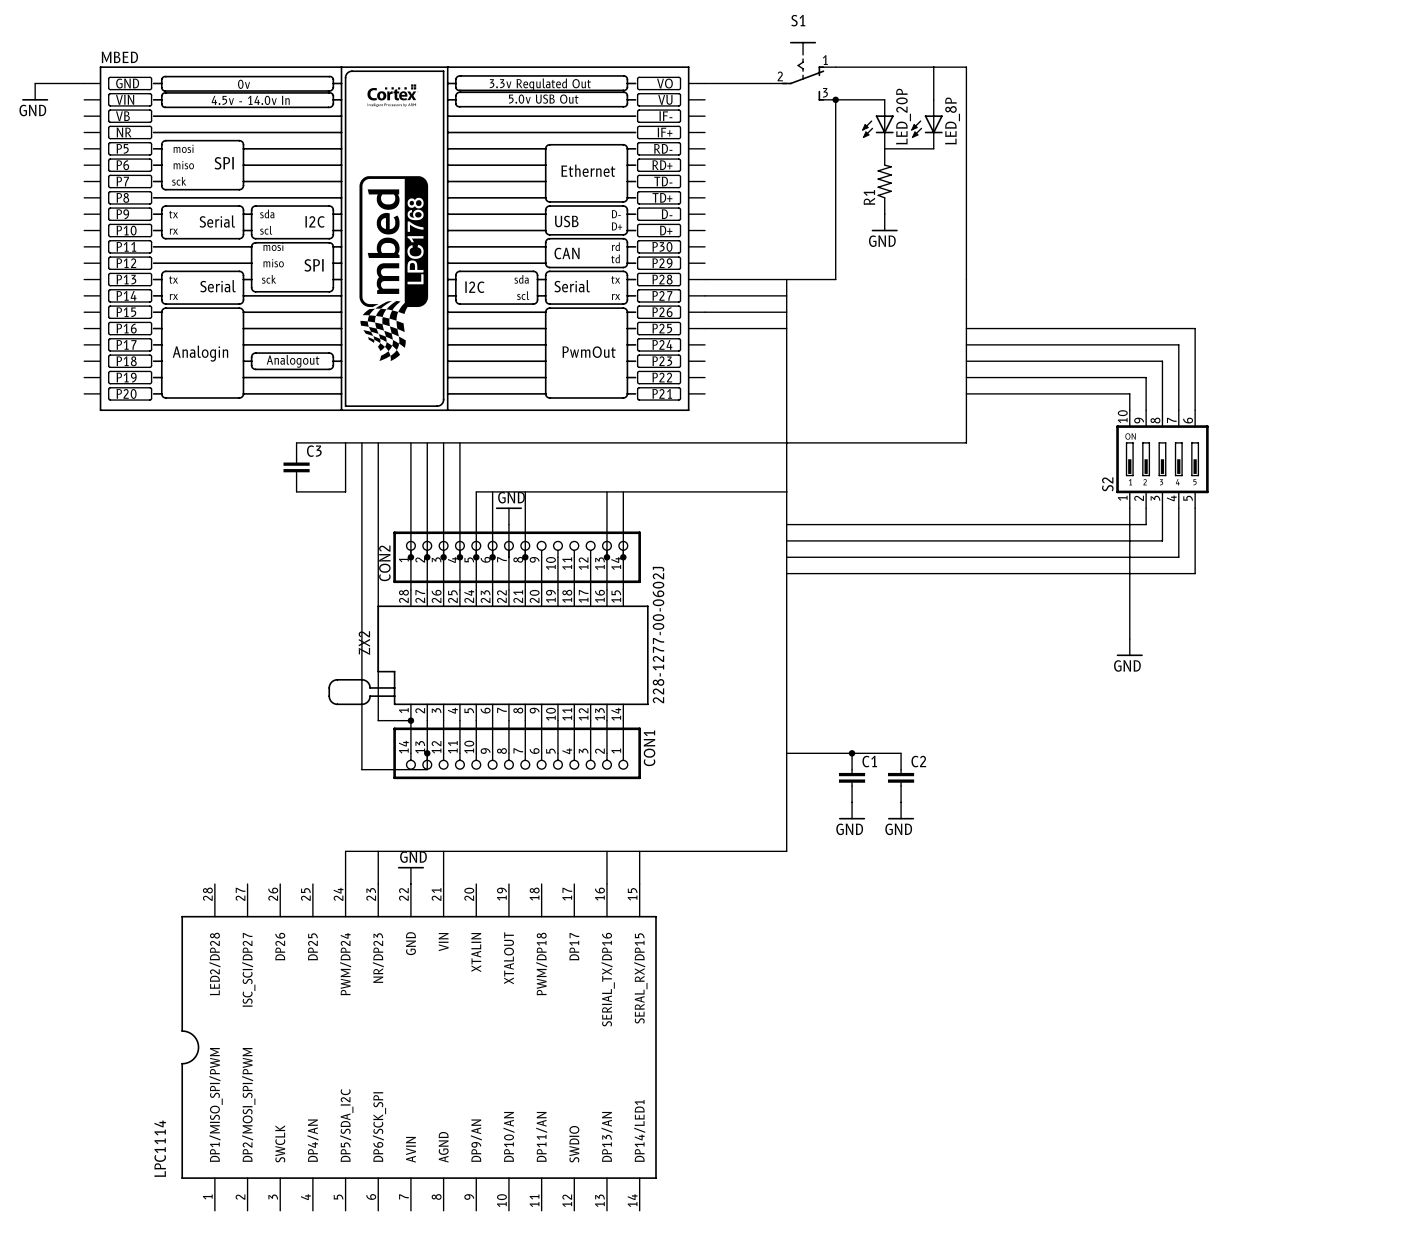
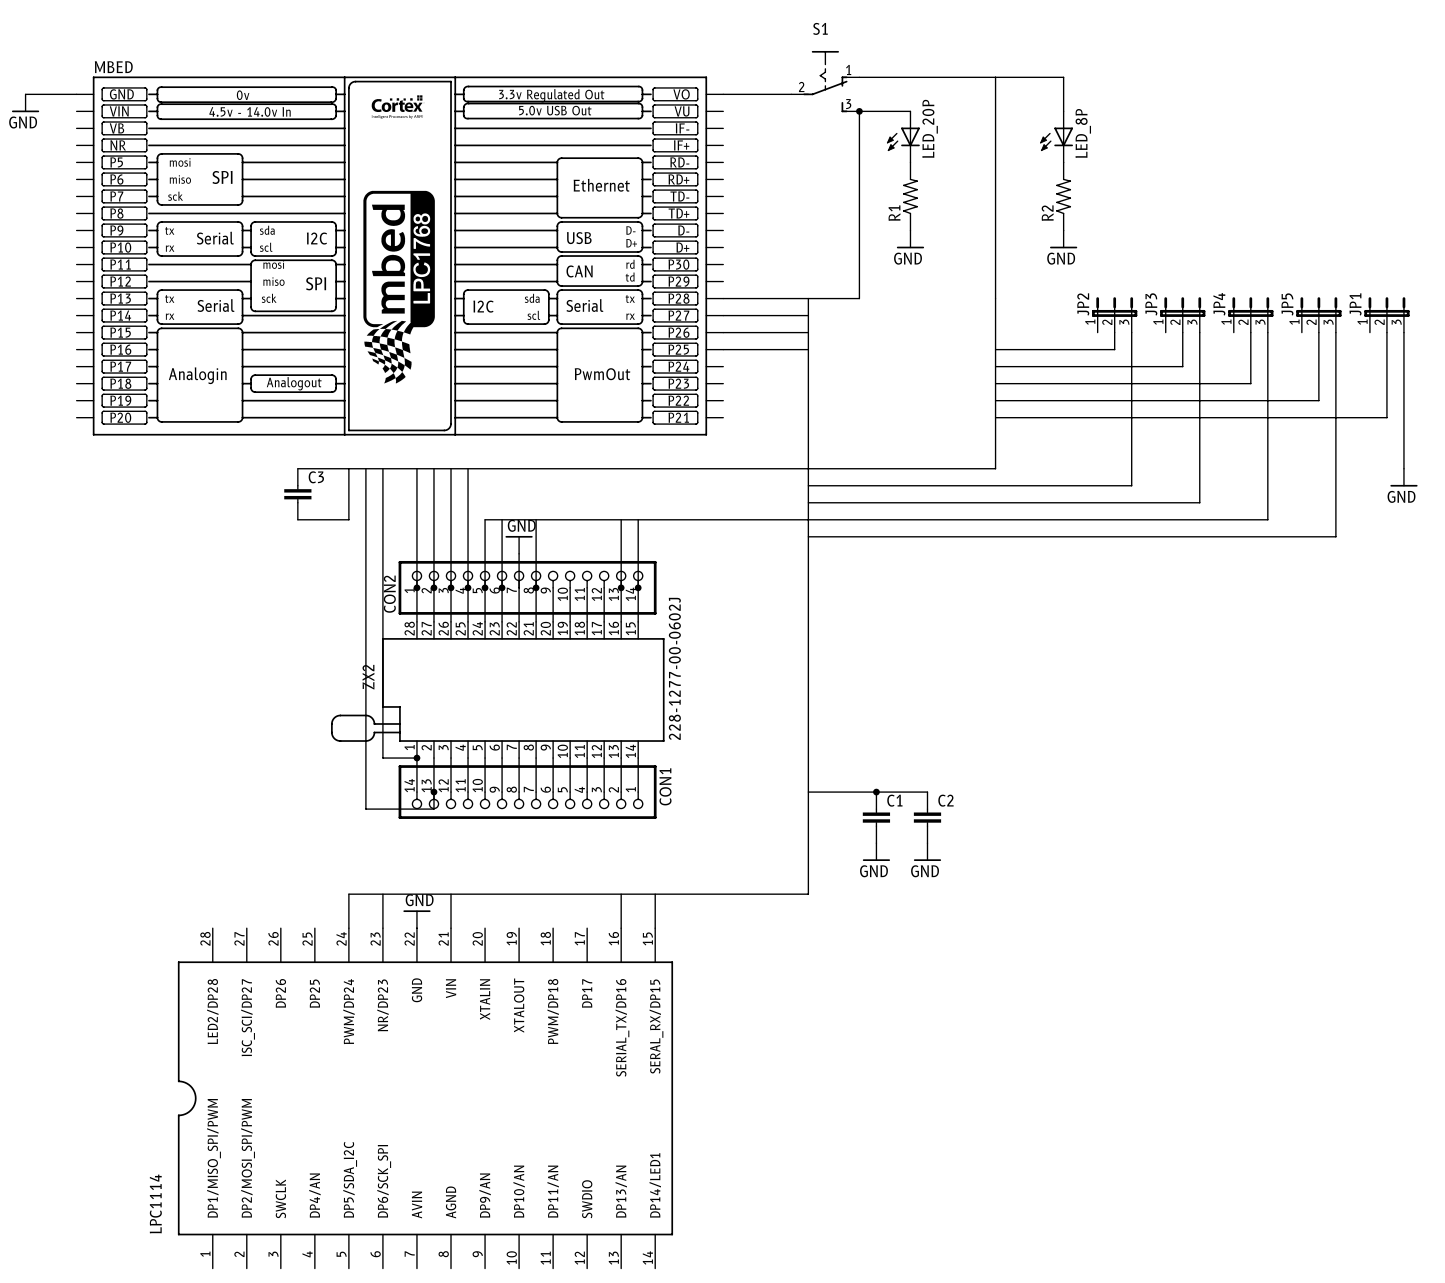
wire: (933, 67) (933, 99) -> none
wire: none -> (995, 77) (1063, 77) (1063, 111)
LED_8P position: (926, 124) -> (1056, 136)
wire: (884, 148) (933, 148) -> none
R2: none -> (1063, 196)
power symbol: none -> GND (1063, 239)
JP2: none -> (1114, 314)
JP3: none -> (1182, 314)
JP4: none -> (1250, 314)
JP5: none -> (1318, 314)
JP1: none -> (1386, 314)
wire: none -> (1131, 332) (1131, 485) (808, 485)
wire: none -> (1199, 332) (1199, 383) (1250, 383) (1250, 332)
wire: none -> (1267, 332) (1267, 519) (808, 519)
wire: none -> (1335, 332) (1335, 536) (808, 536)
wire: none -> (1403, 332) (1403, 468)
wire: (1080, 328) (1195, 328) (1195, 410) -> (1114, 349) (1114, 332)
wire: (1146, 344) (1178, 344) (1178, 410) -> (1182, 366) (1182, 332)
wire: (1146, 377) (1146, 410) -> (1182, 400) (1318, 400) (1318, 332)
wire: (1129, 393) (1129, 410) -> (1165, 417) (1386, 417) (1386, 332)
wire: none -> (1199, 434) (1199, 502) (808, 502)
power symbol: none -> GND (1403, 477)
S2: (1162, 459) -> none
wire: (1129, 508) (1129, 638) -> none
wire: (1146, 508) (1146, 524) (786, 524) -> none
wire: (1162, 508) (1162, 540) (786, 540) -> none
wire: (1178, 508) (1178, 557) (786, 557) -> none
wire: (1195, 508) (1195, 573) (786, 573) -> none
power symbol: GND (1129, 647) -> none

